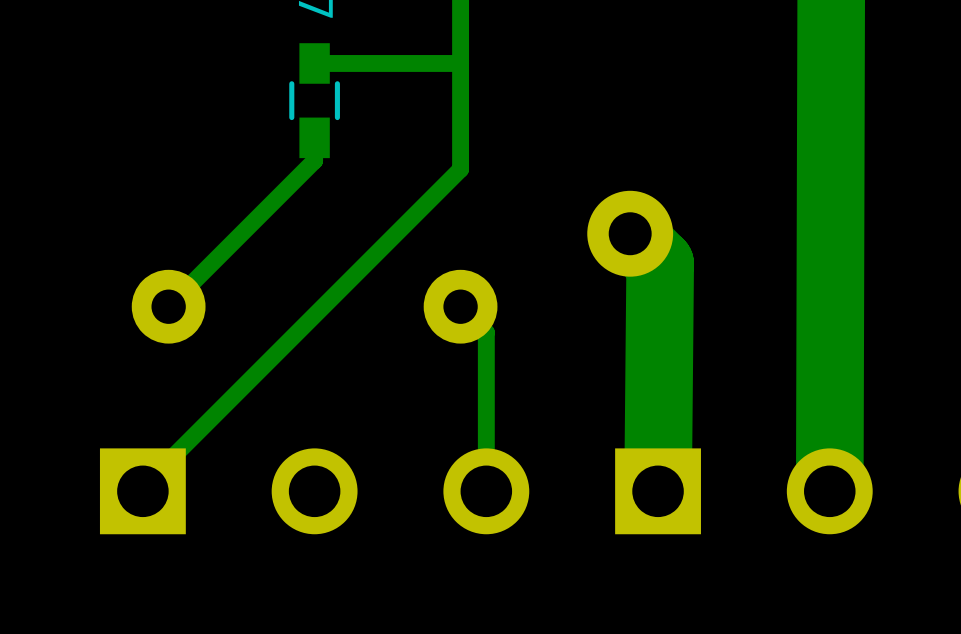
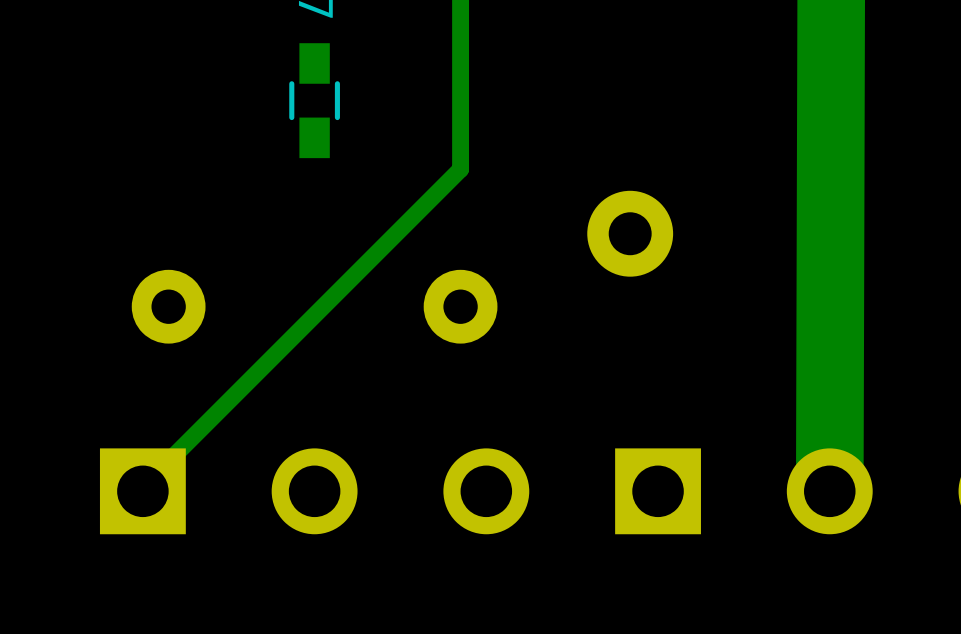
track: (460, 63) (314, 63) -> none
track: (314, 137) (314, 160) (168, 306) -> none
track: (630, 233) (660, 263) (658, 491) -> none
track: (460, 306) (486, 332) (486, 487) -> none

